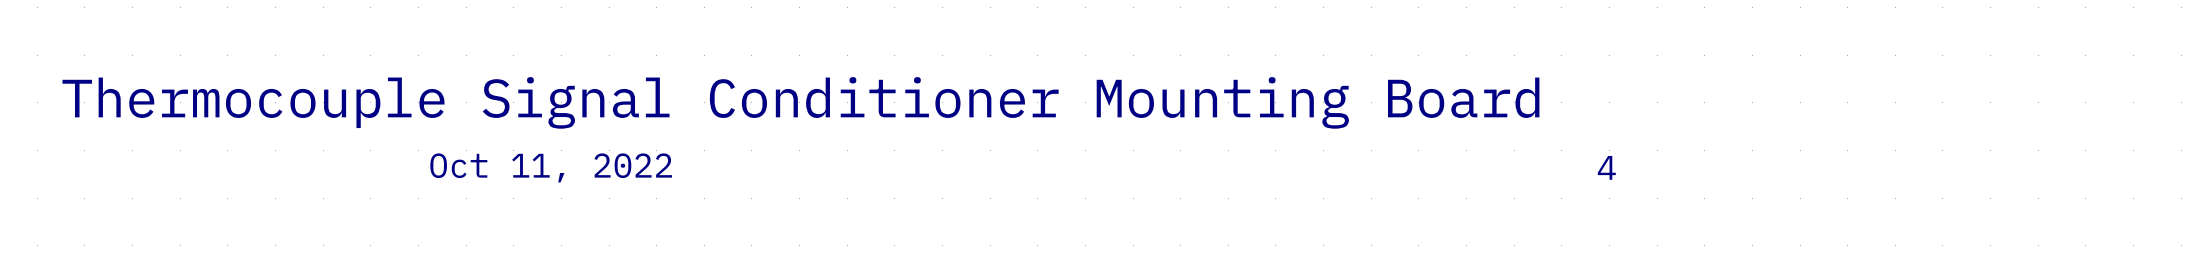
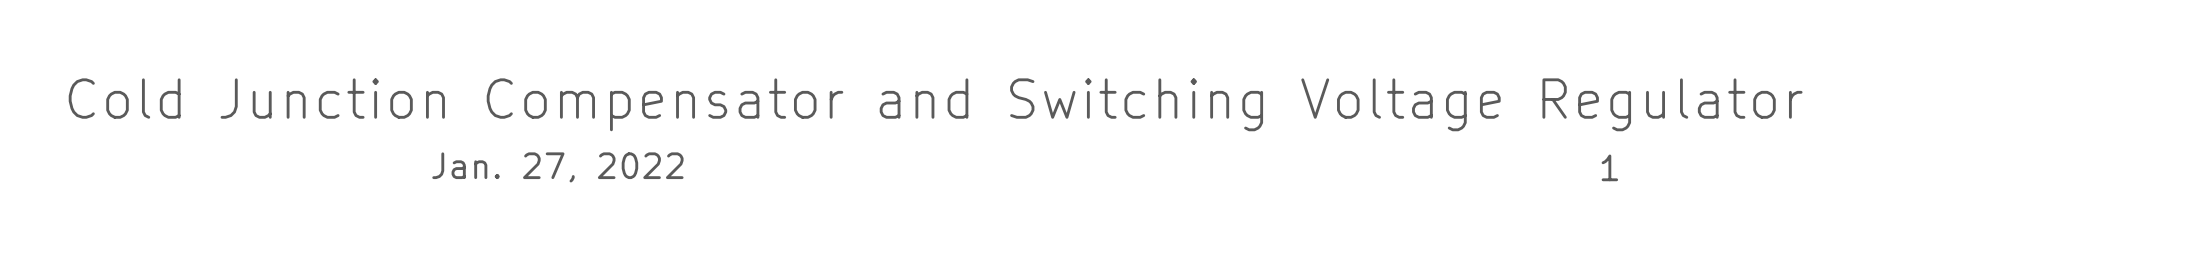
text: Thermocouple Signal Conditioner Mounting Board (800, 102) -> Cold Junction Compensator and Switching Voltage Regulator (935, 104)
text: Oct 11, 2022 (551, 167) -> Jan. 27, 2022 (557, 167)
text: 4 (1606, 167) -> 1 (1609, 167)

